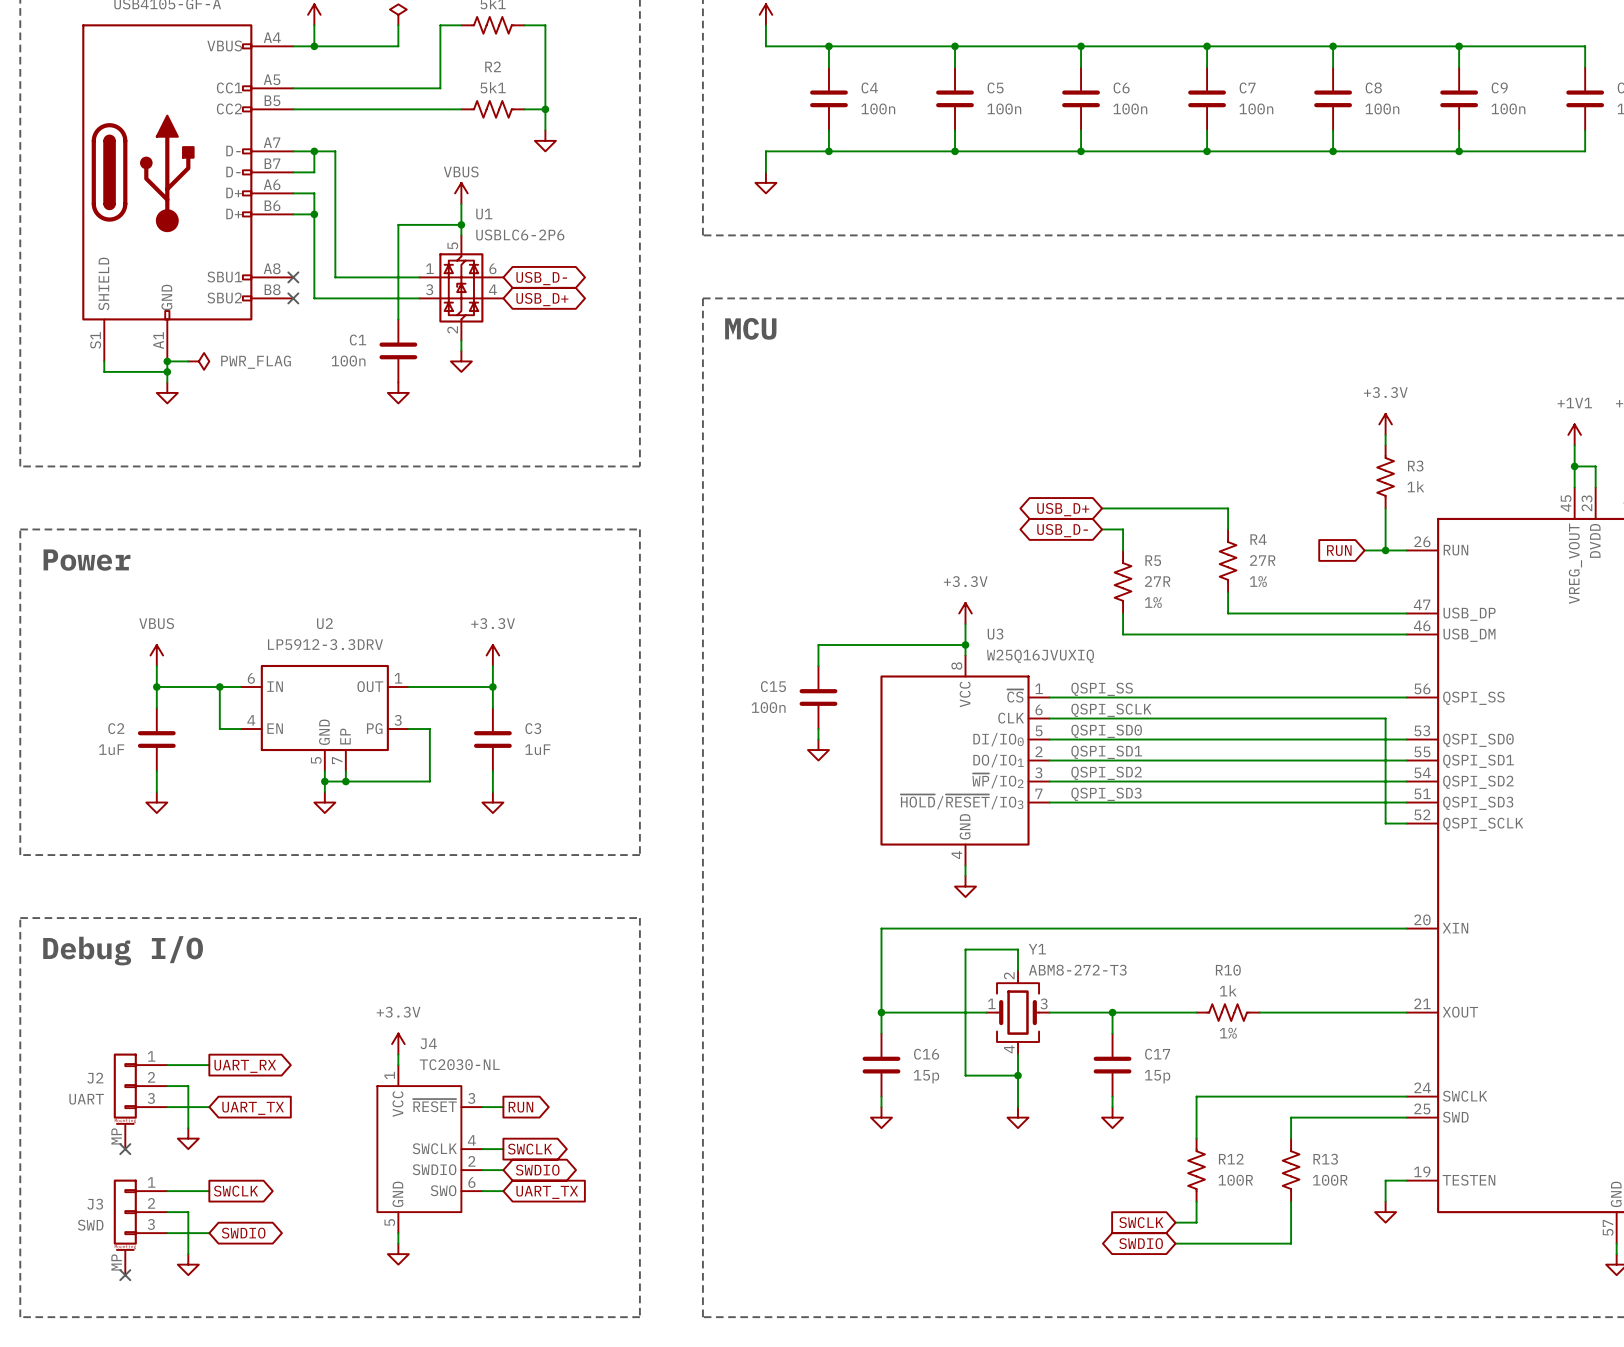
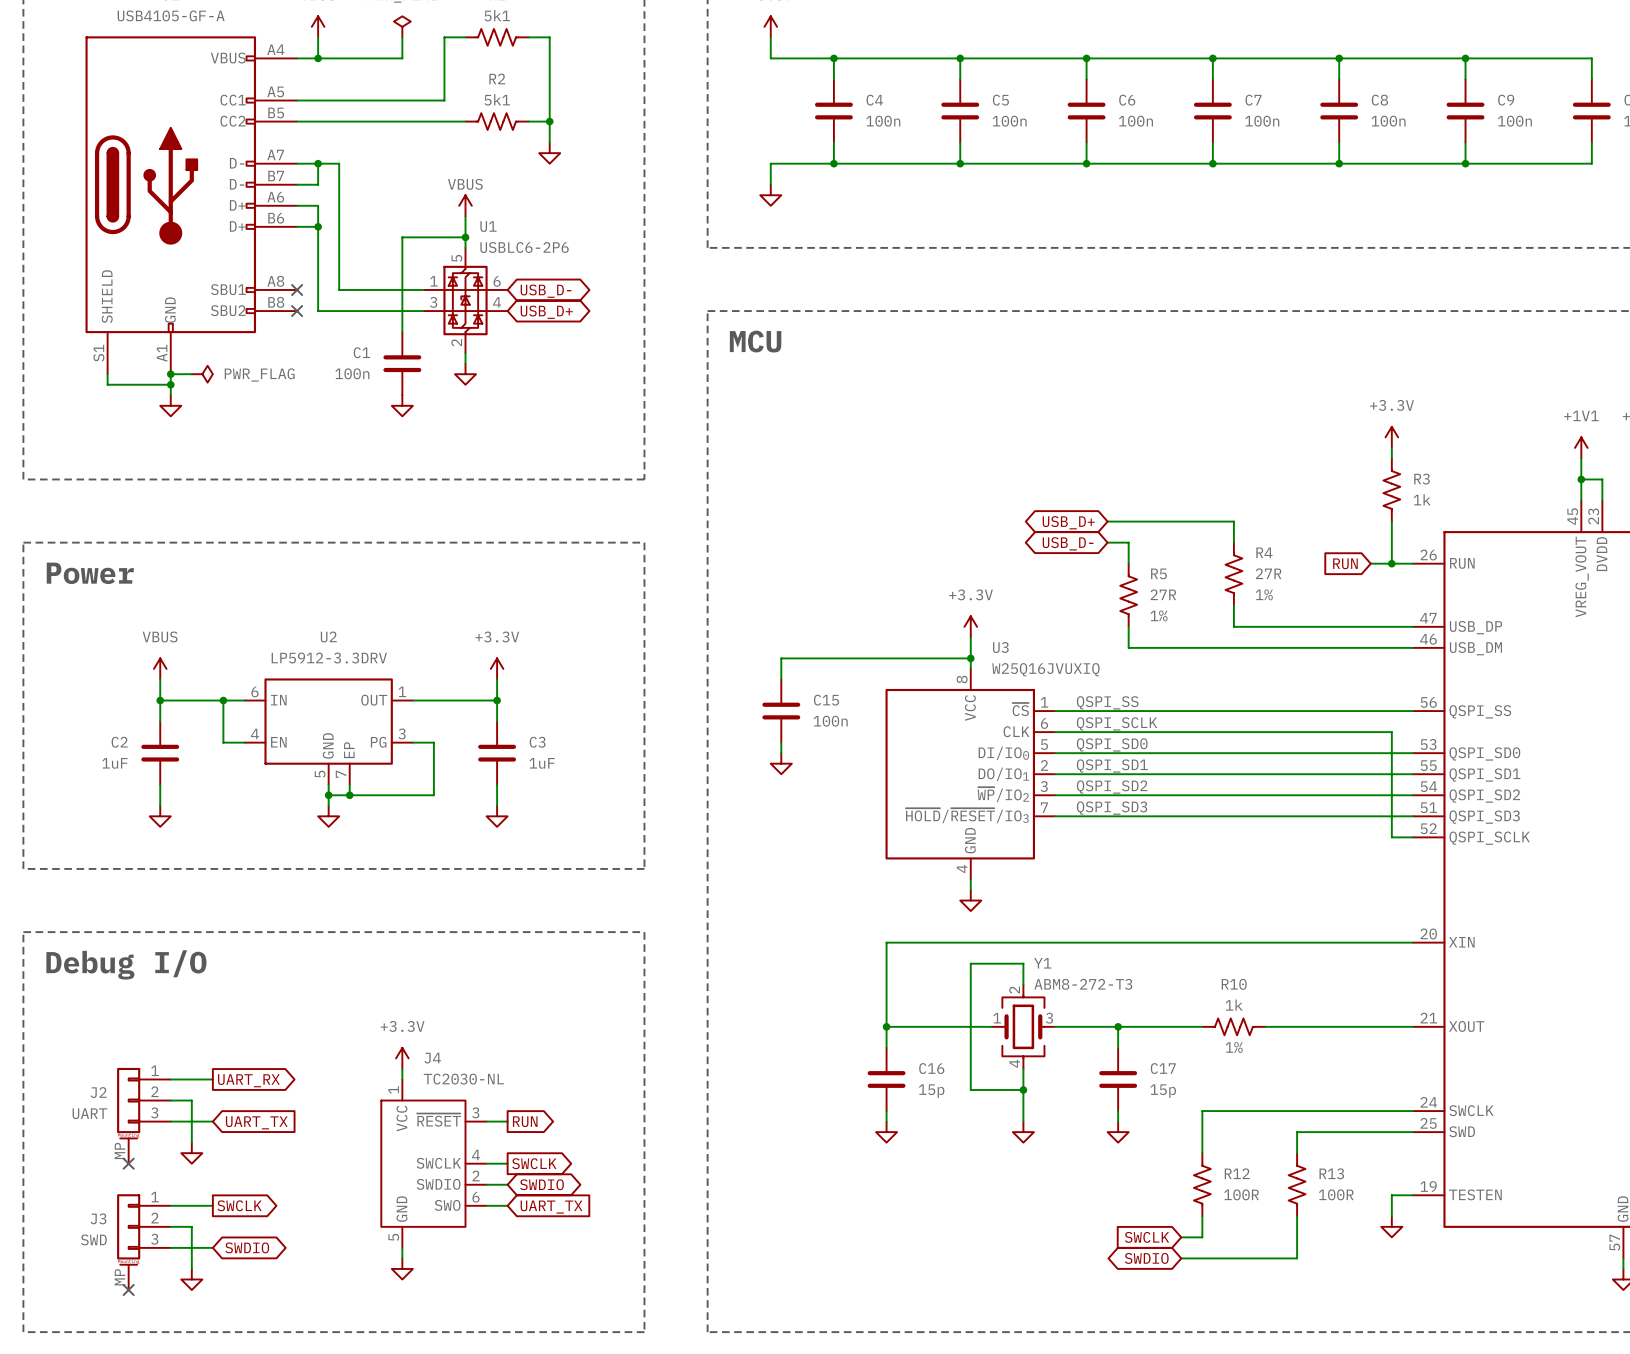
wire: (818, 644) (818, 665) -> (823, 658) (781, 658) (781, 679)
C15 name position: C15 (773, 686) -> C15 (826, 700)
C15 position: (818, 697) -> (781, 711)
C15 value position: 100n (768, 707) -> 100n (830, 721)
wire: (818, 729) (818, 739) -> (781, 742) (781, 753)
power symbol position: (818, 750) -> (781, 763)

